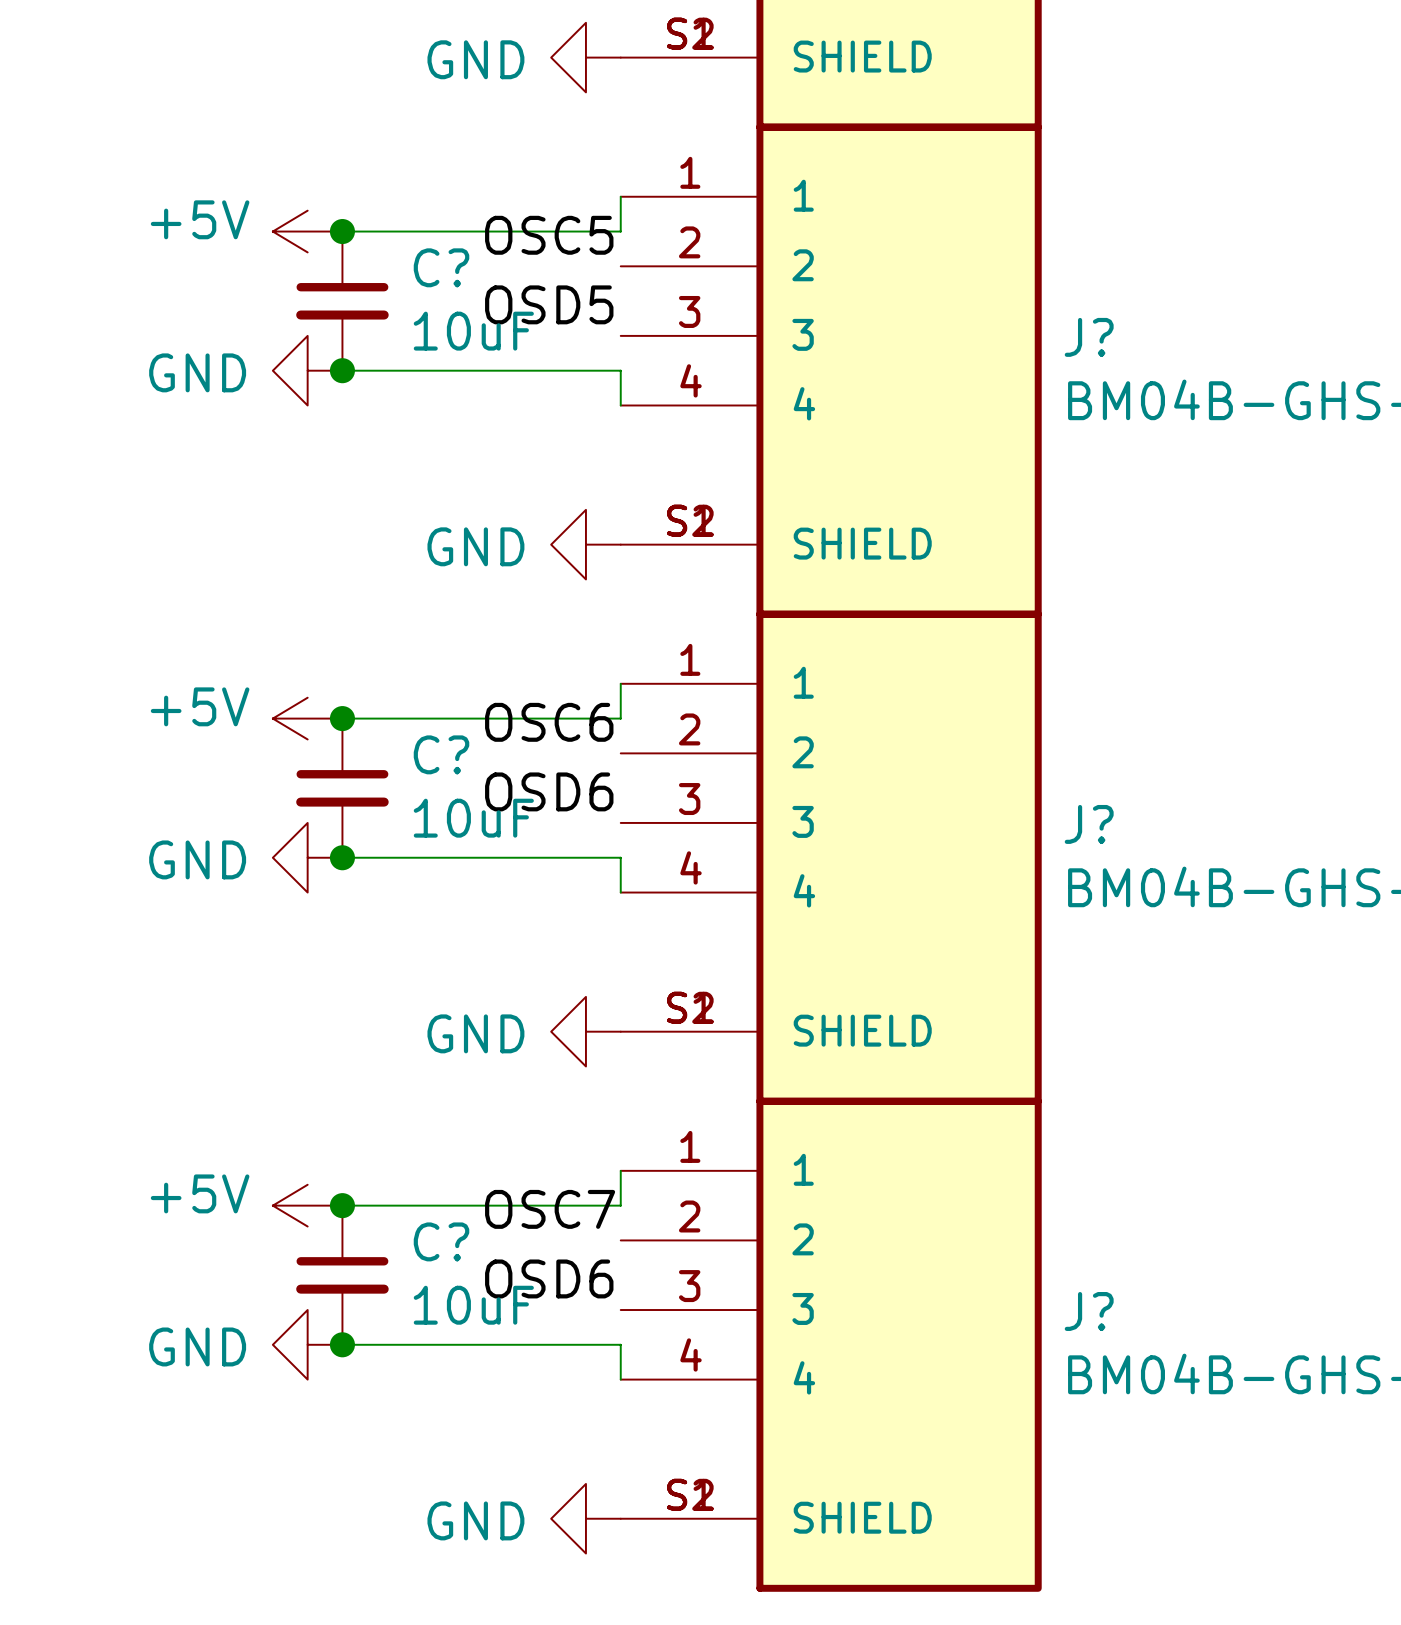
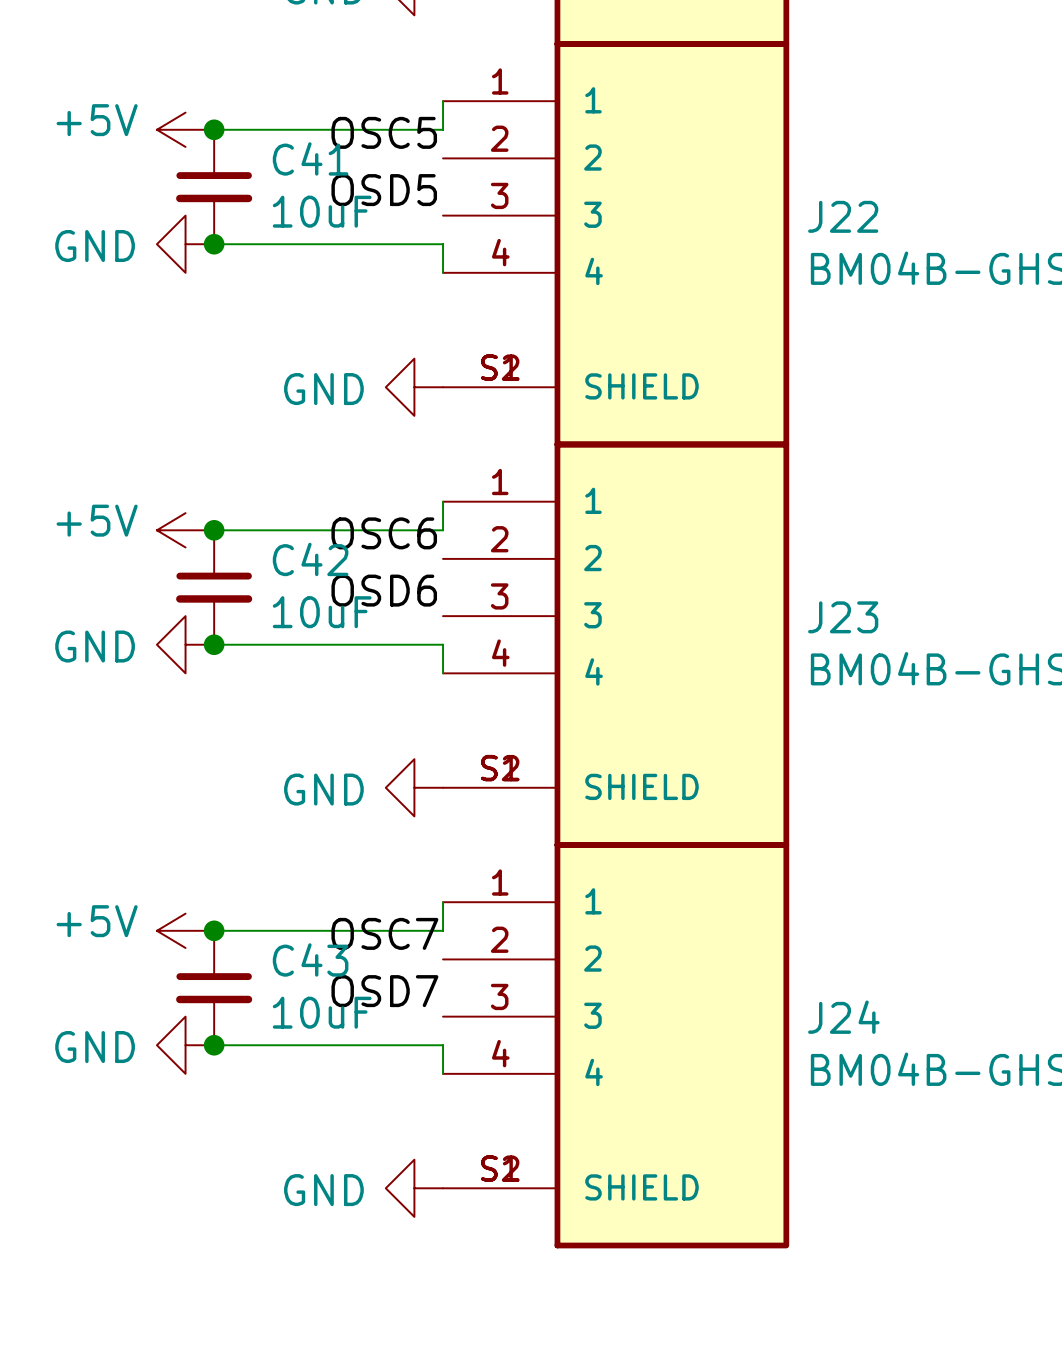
C? name: C? (441, 267) -> C41 (310, 158)
J? name: J? (1089, 337) -> J22 (843, 216)
C? name: C? (441, 754) -> C42 (310, 559)
J? name: J? (1089, 824) -> J23 (843, 617)
C? name: C? (441, 1241) -> C43 (310, 959)
label: OSD6 (549, 1278) -> OSD7 (384, 991)
J? name: J? (1089, 1311) -> J24 (843, 1017)

